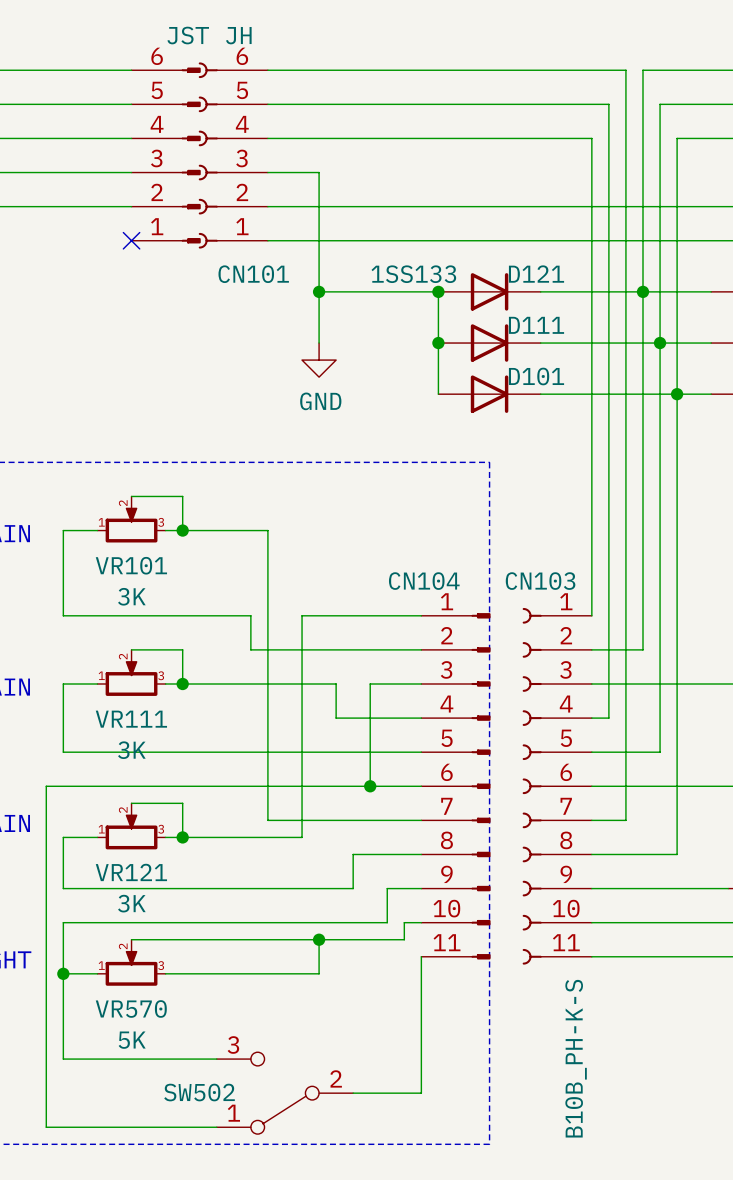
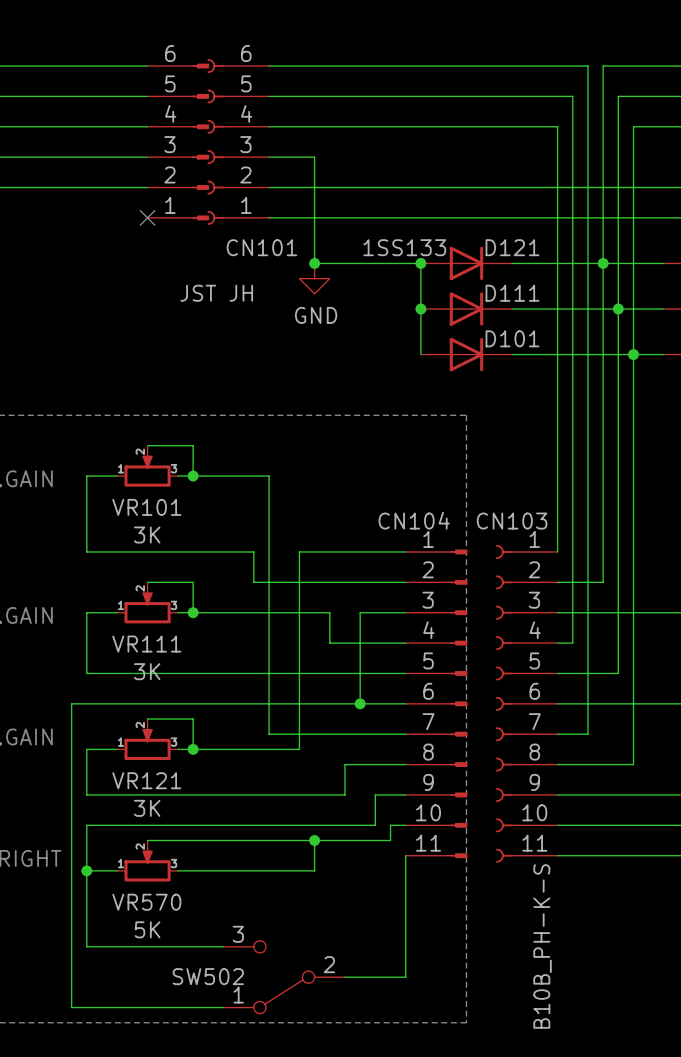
CN101 value position: JST JH (209, 35) -> JST JH (216, 293)
wire: (319, 291) (319, 343) -> none
power symbol position: GND (319, 360) -> GND (314, 278)

